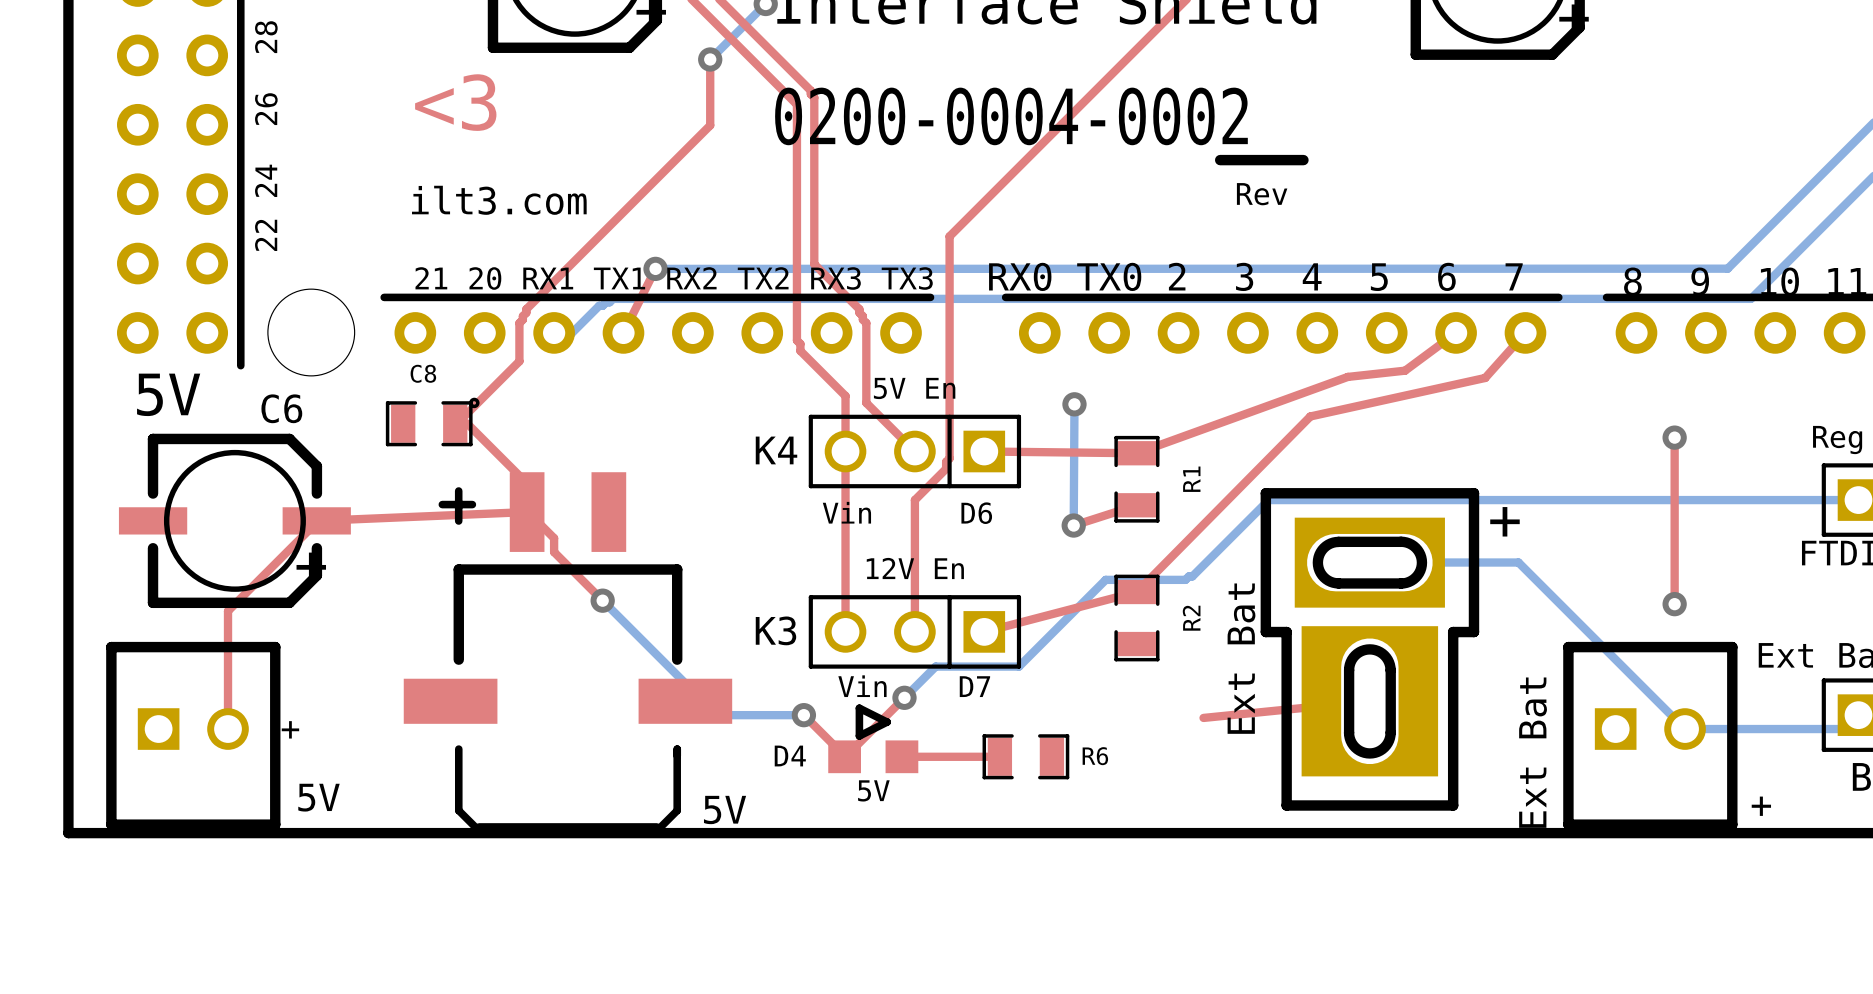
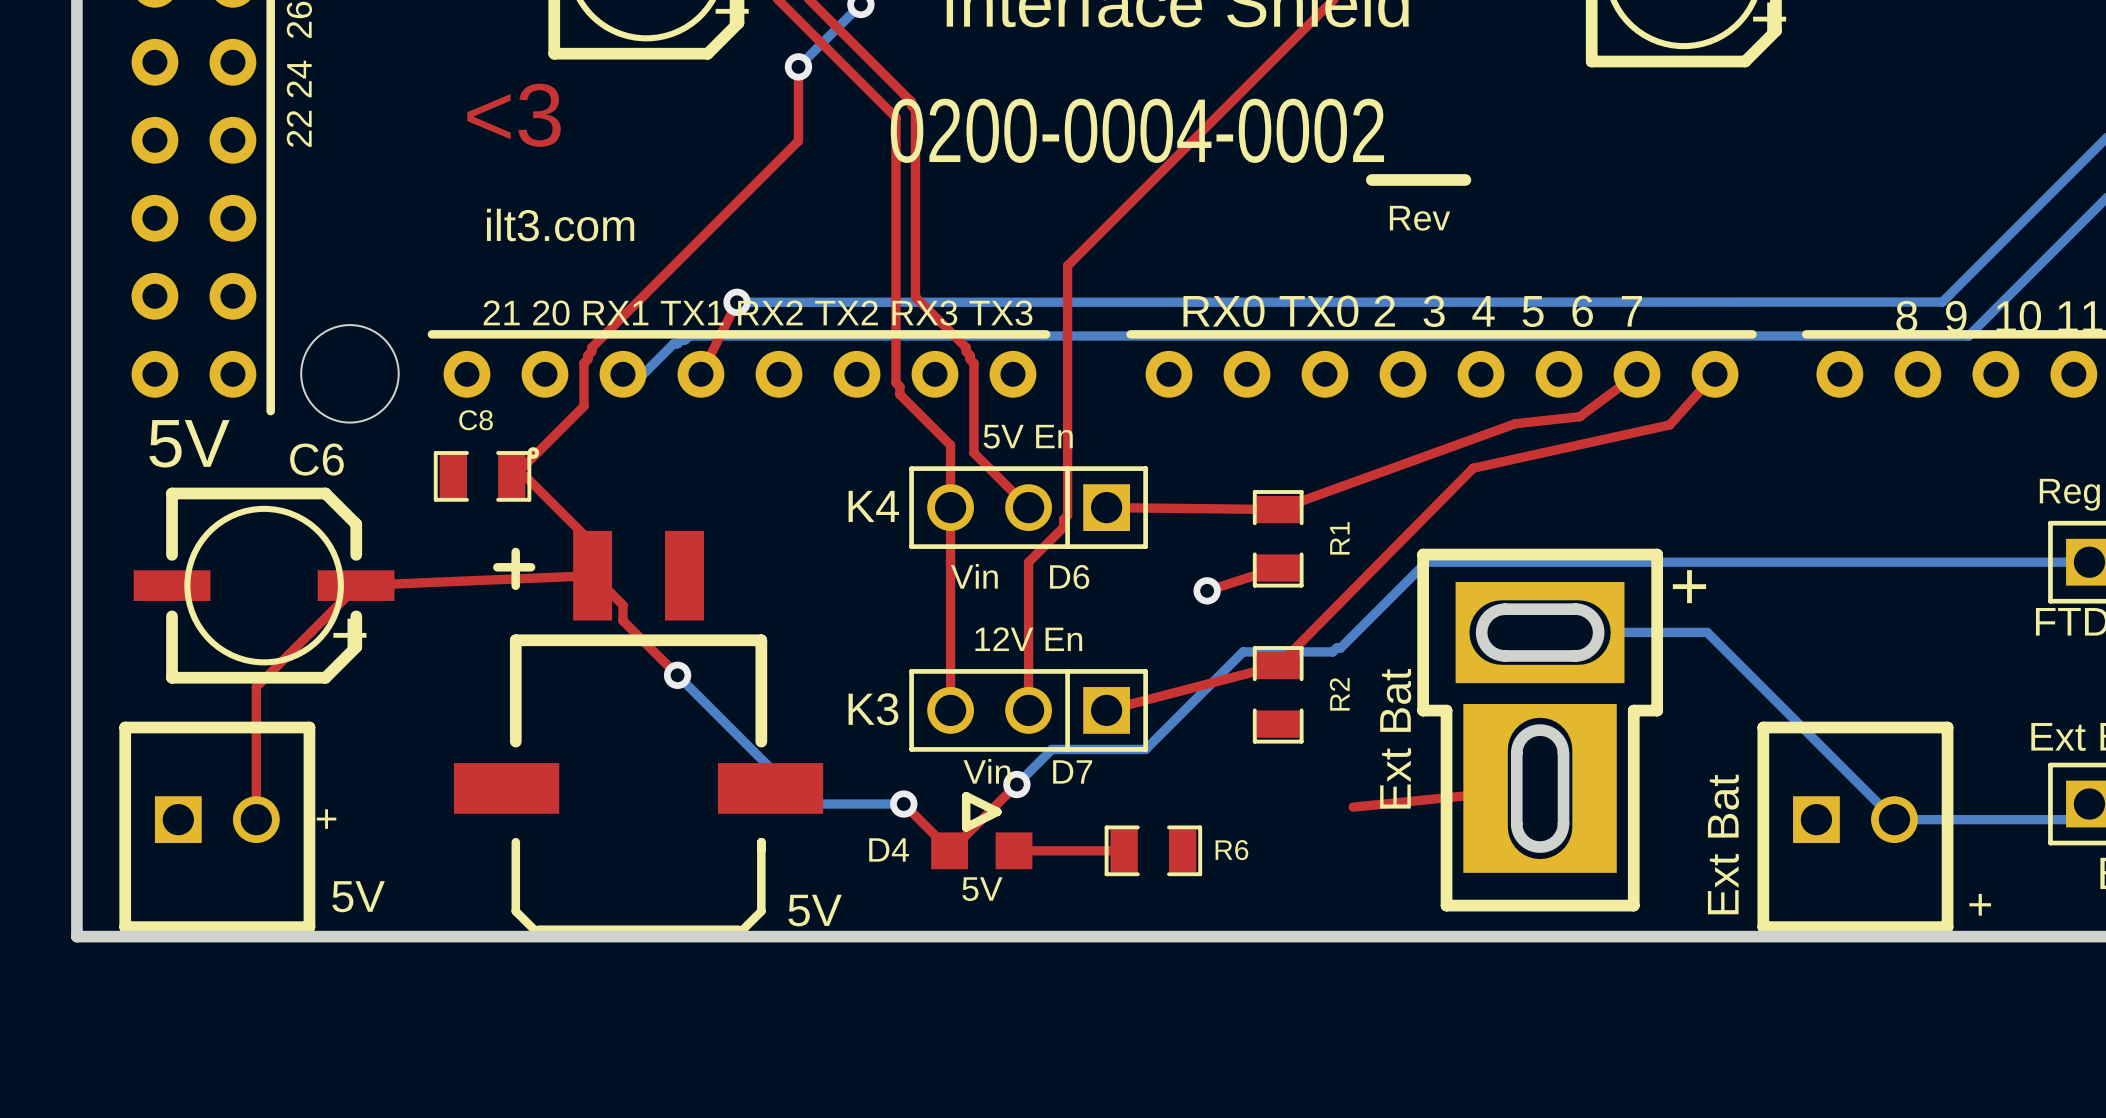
bottom track: (1074, 404) (1073, 525) -> none
via: (1074, 404) -> none
top track: (1674, 437) (1674, 604) -> none
via: (1674, 437) -> none
via: (1674, 604) -> none

